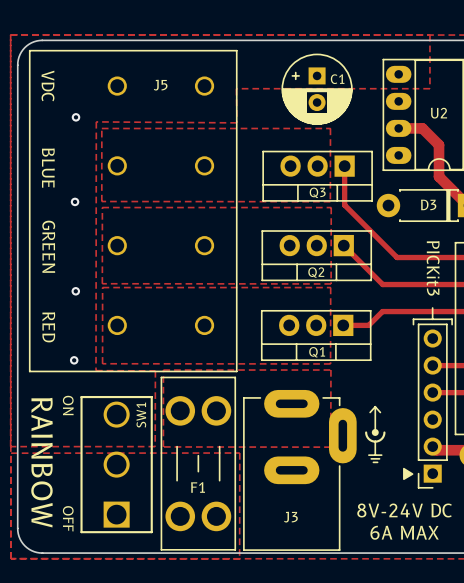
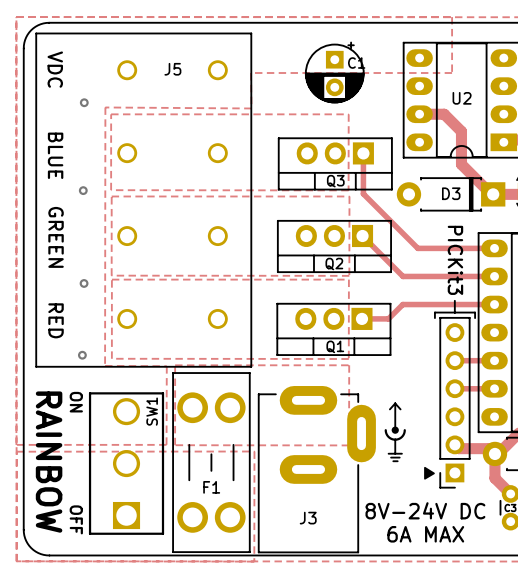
C1 footprint: [281, 53, 353, 125] -> [305, 41, 365, 104]

